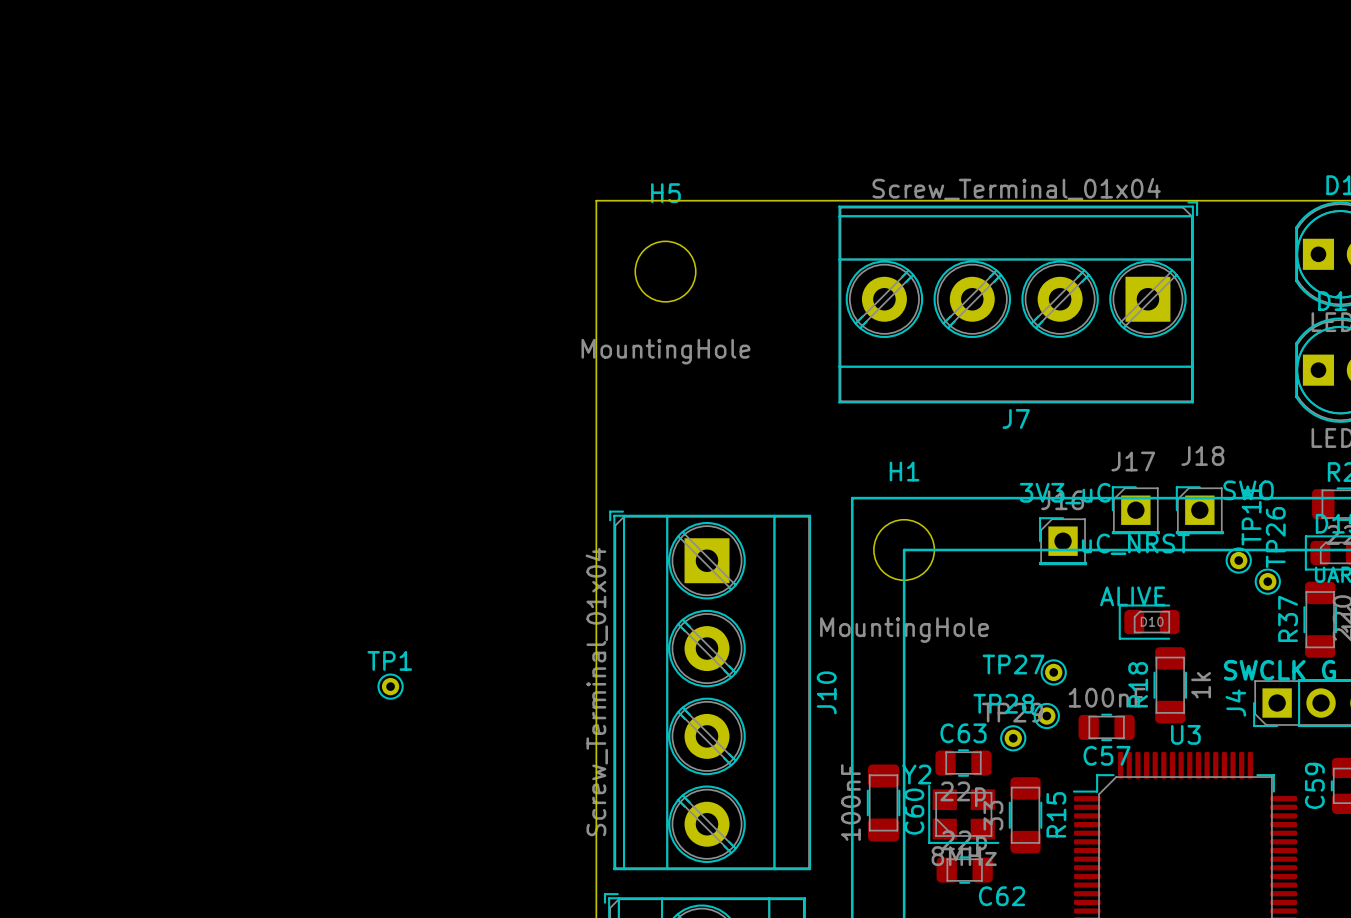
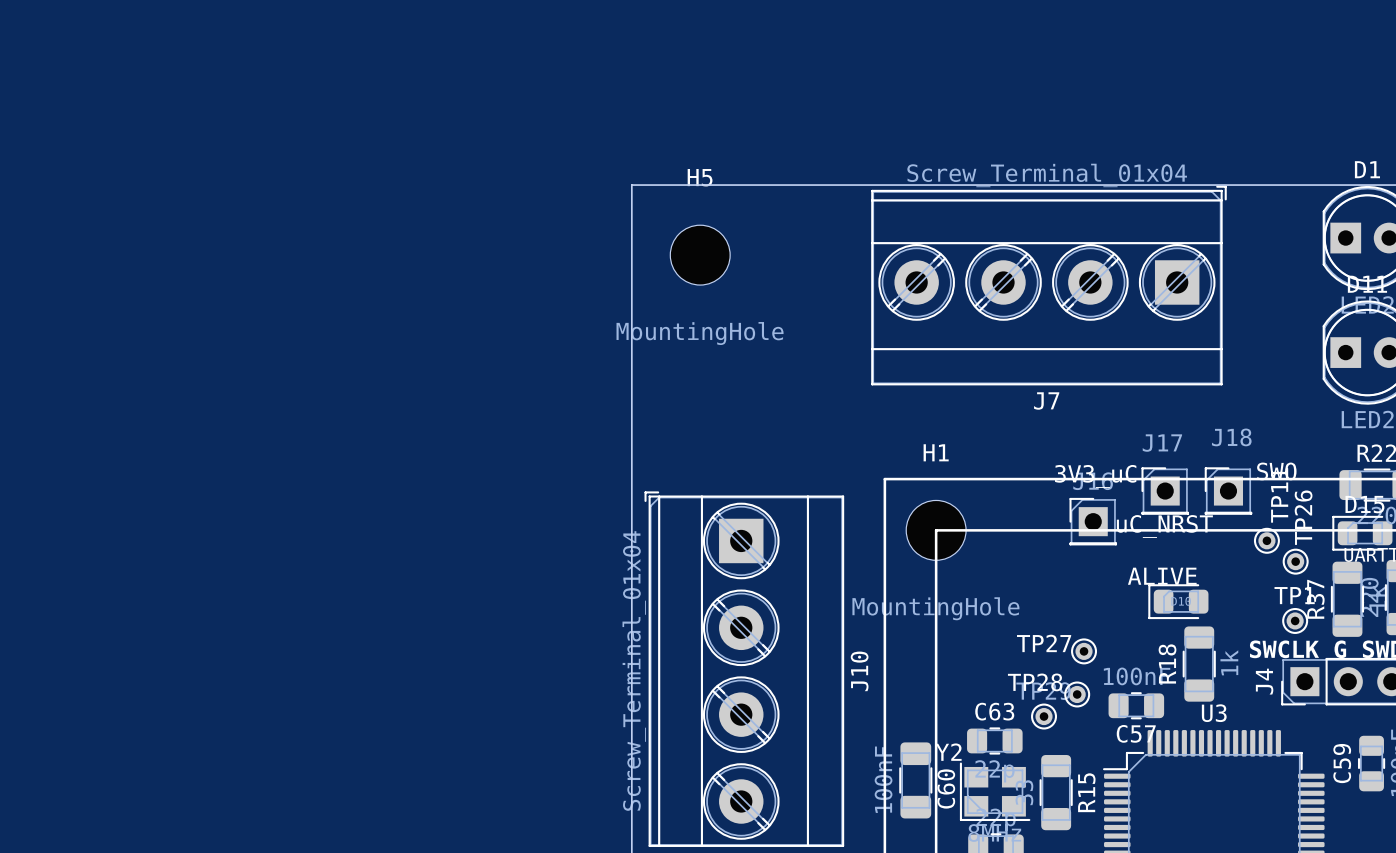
TP1 position: (390, 686) -> (1295, 620)

